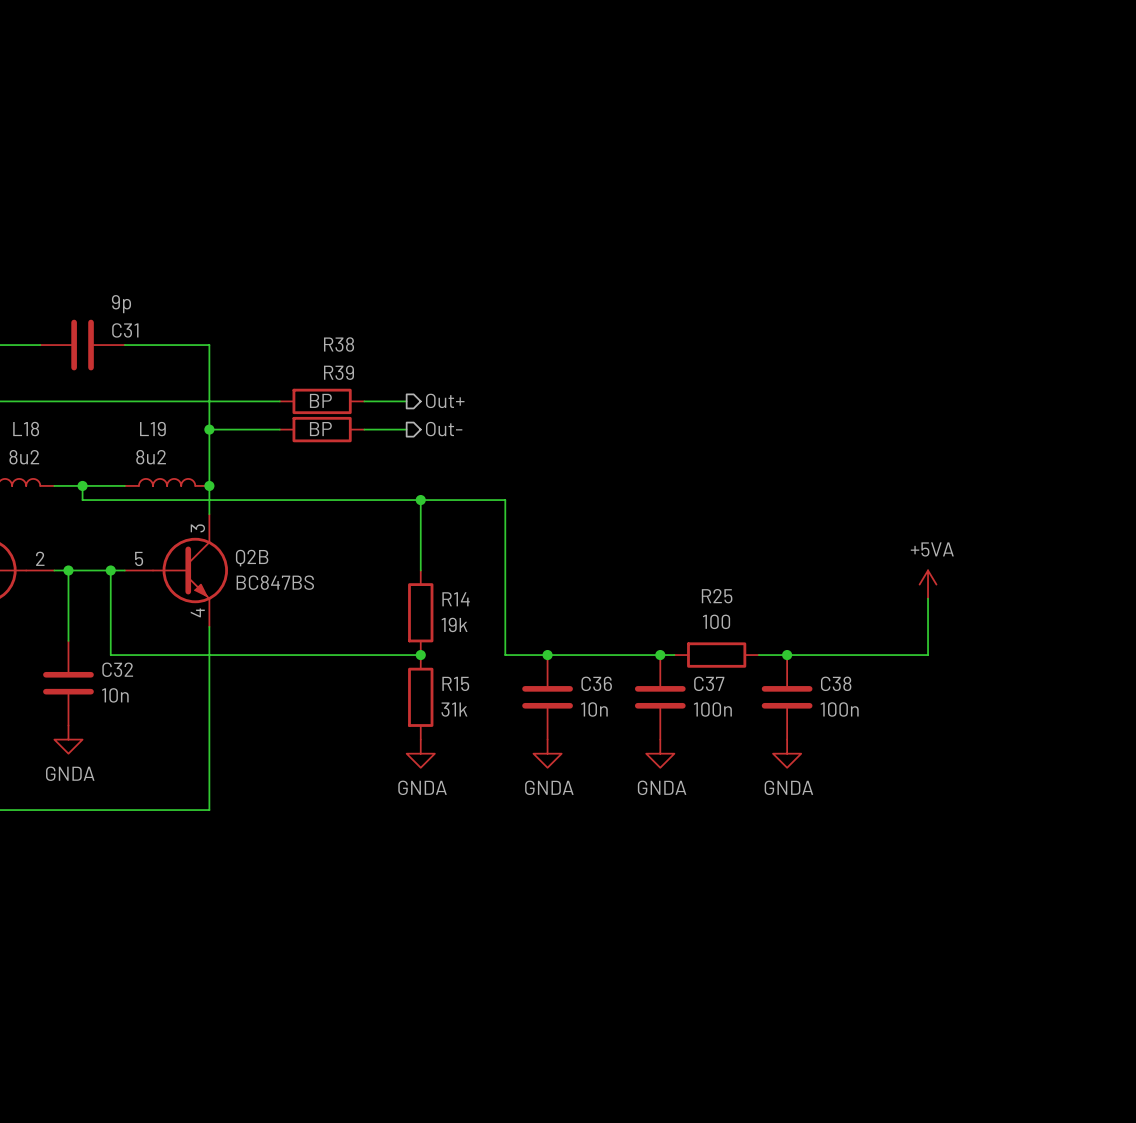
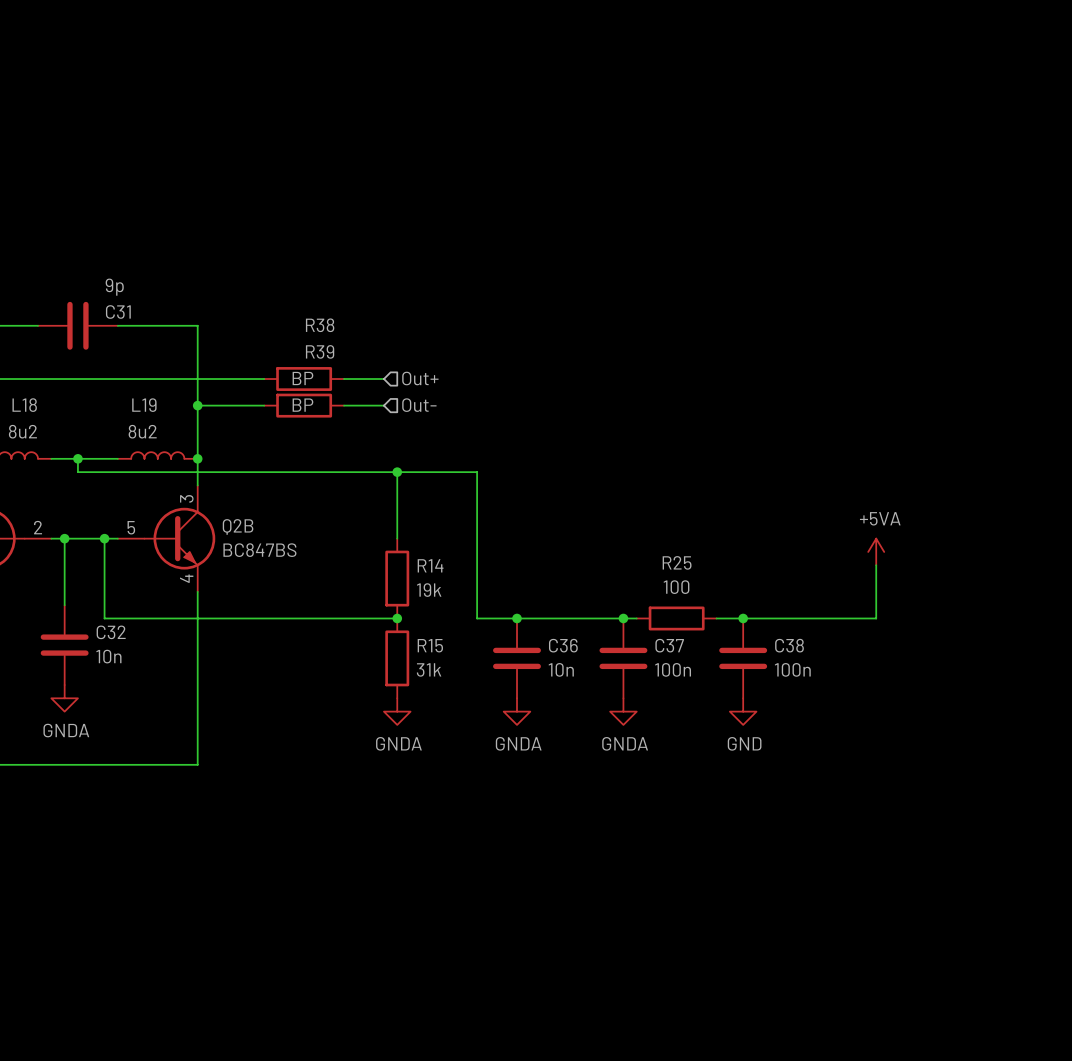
hierarchical label shape: output (445, 400) -> input (420, 378)
hierarchical label shape: output (444, 429) -> input (419, 405)
power symbol: GNDA (787, 753) -> GND (743, 711)

